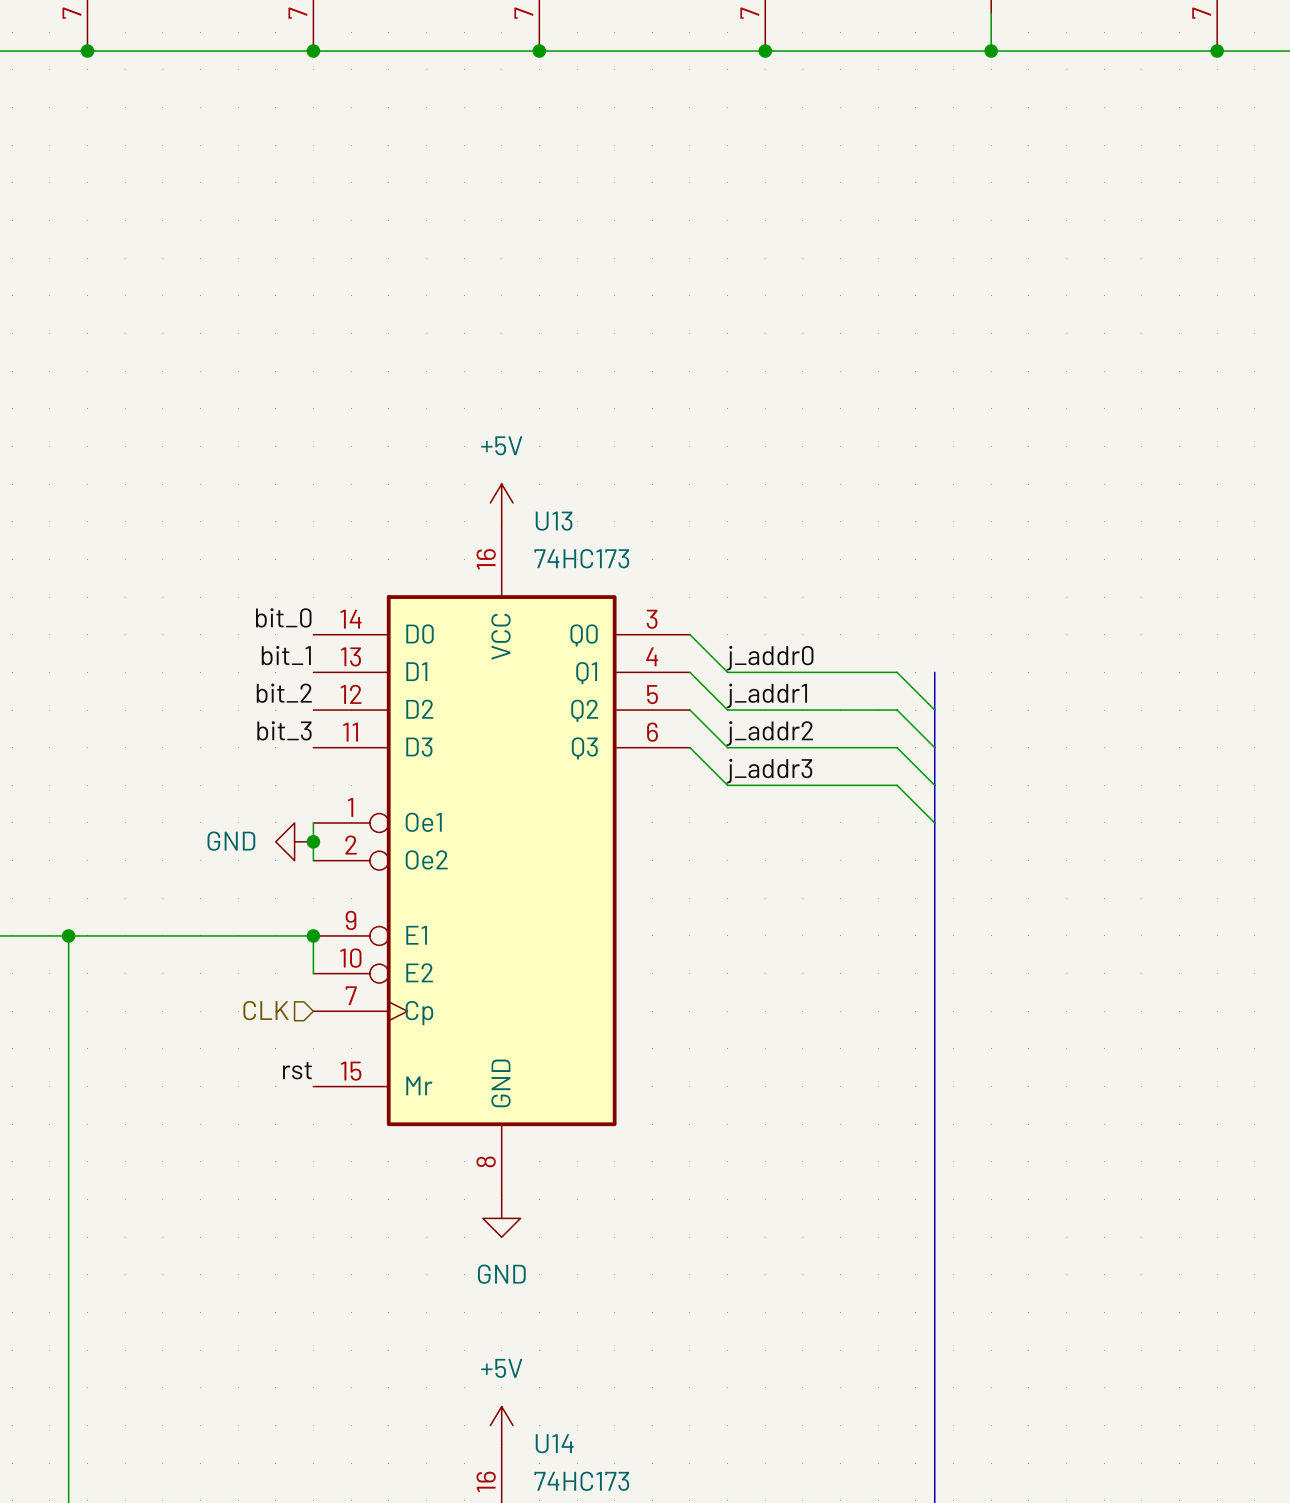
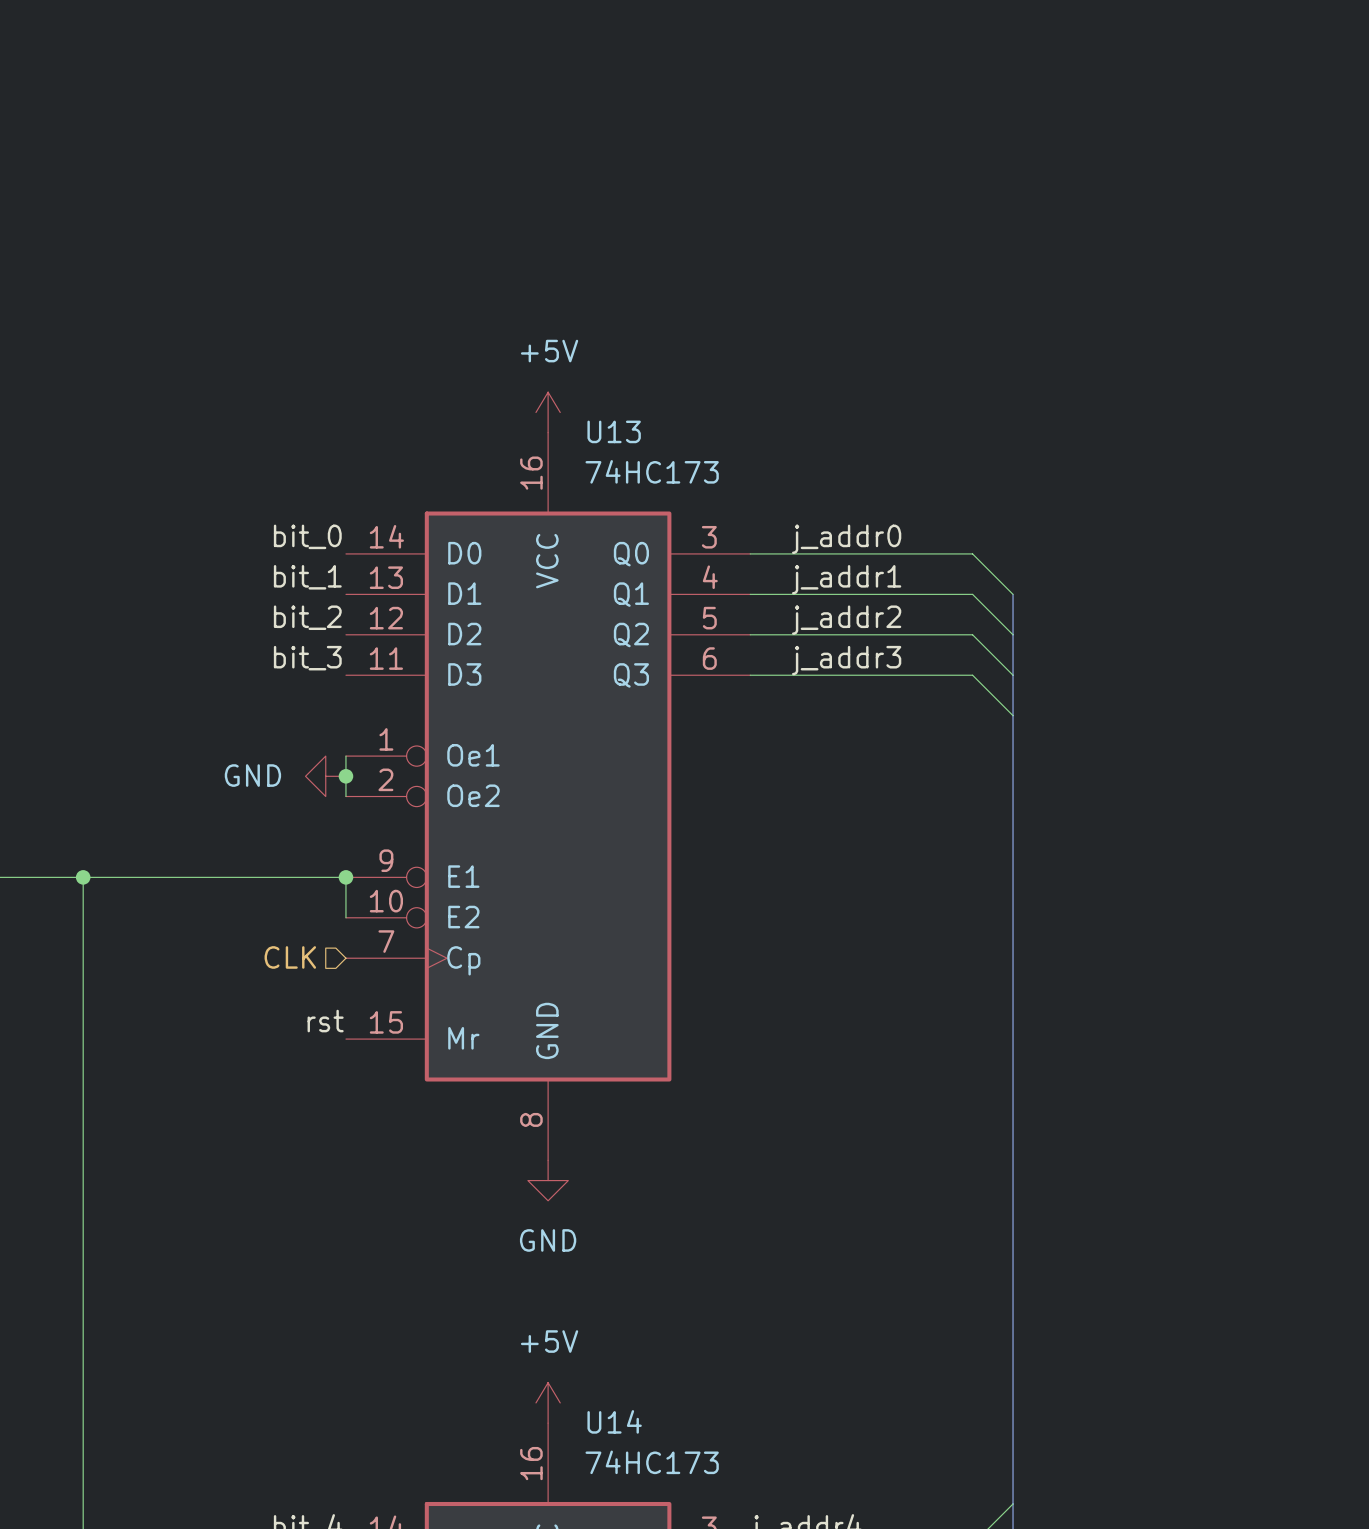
label: none -> j_addr0 (846, 539)
wire: (689, 634) (727, 672) -> (750, 553) (972, 553) (1013, 594)
label: j_addr0 (770, 658) -> j_addr1 (846, 579)
wire: (689, 672) (727, 710) -> (750, 594) (790, 594)
label: j_addr1 (766, 695) -> j_addr2 (846, 620)
wire: (689, 710) (727, 747) -> (750, 634) (790, 634)
label: j_addr2 (769, 733) -> j_addr3 (846, 660)
wire: (689, 747) (727, 785) (897, 785) (934, 822) -> (750, 675) (790, 675)
label: j_addr3 (769, 771) -> none

